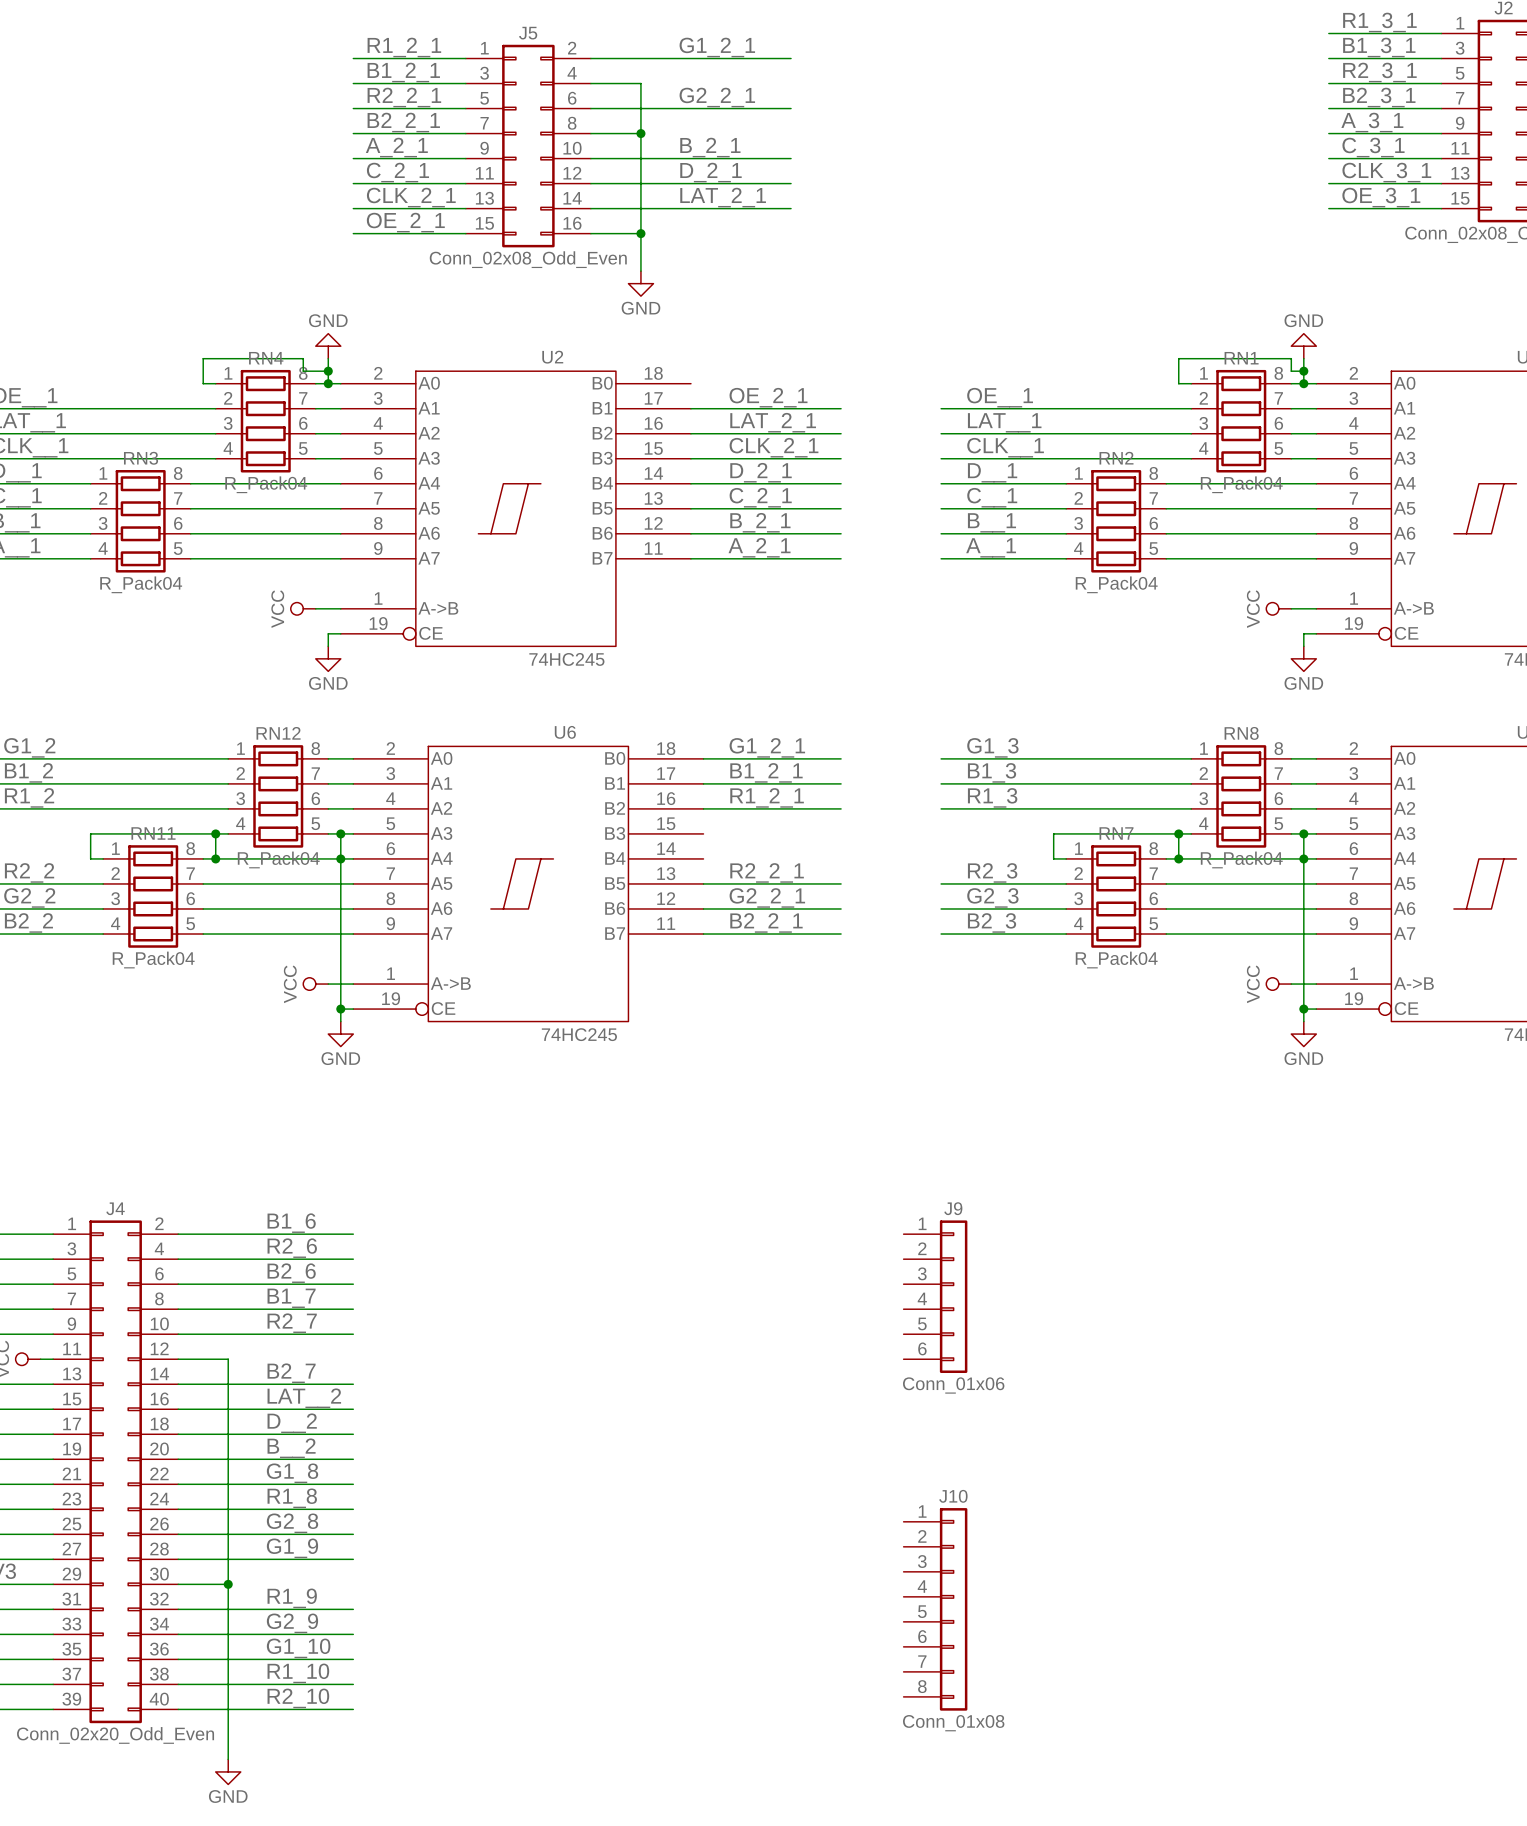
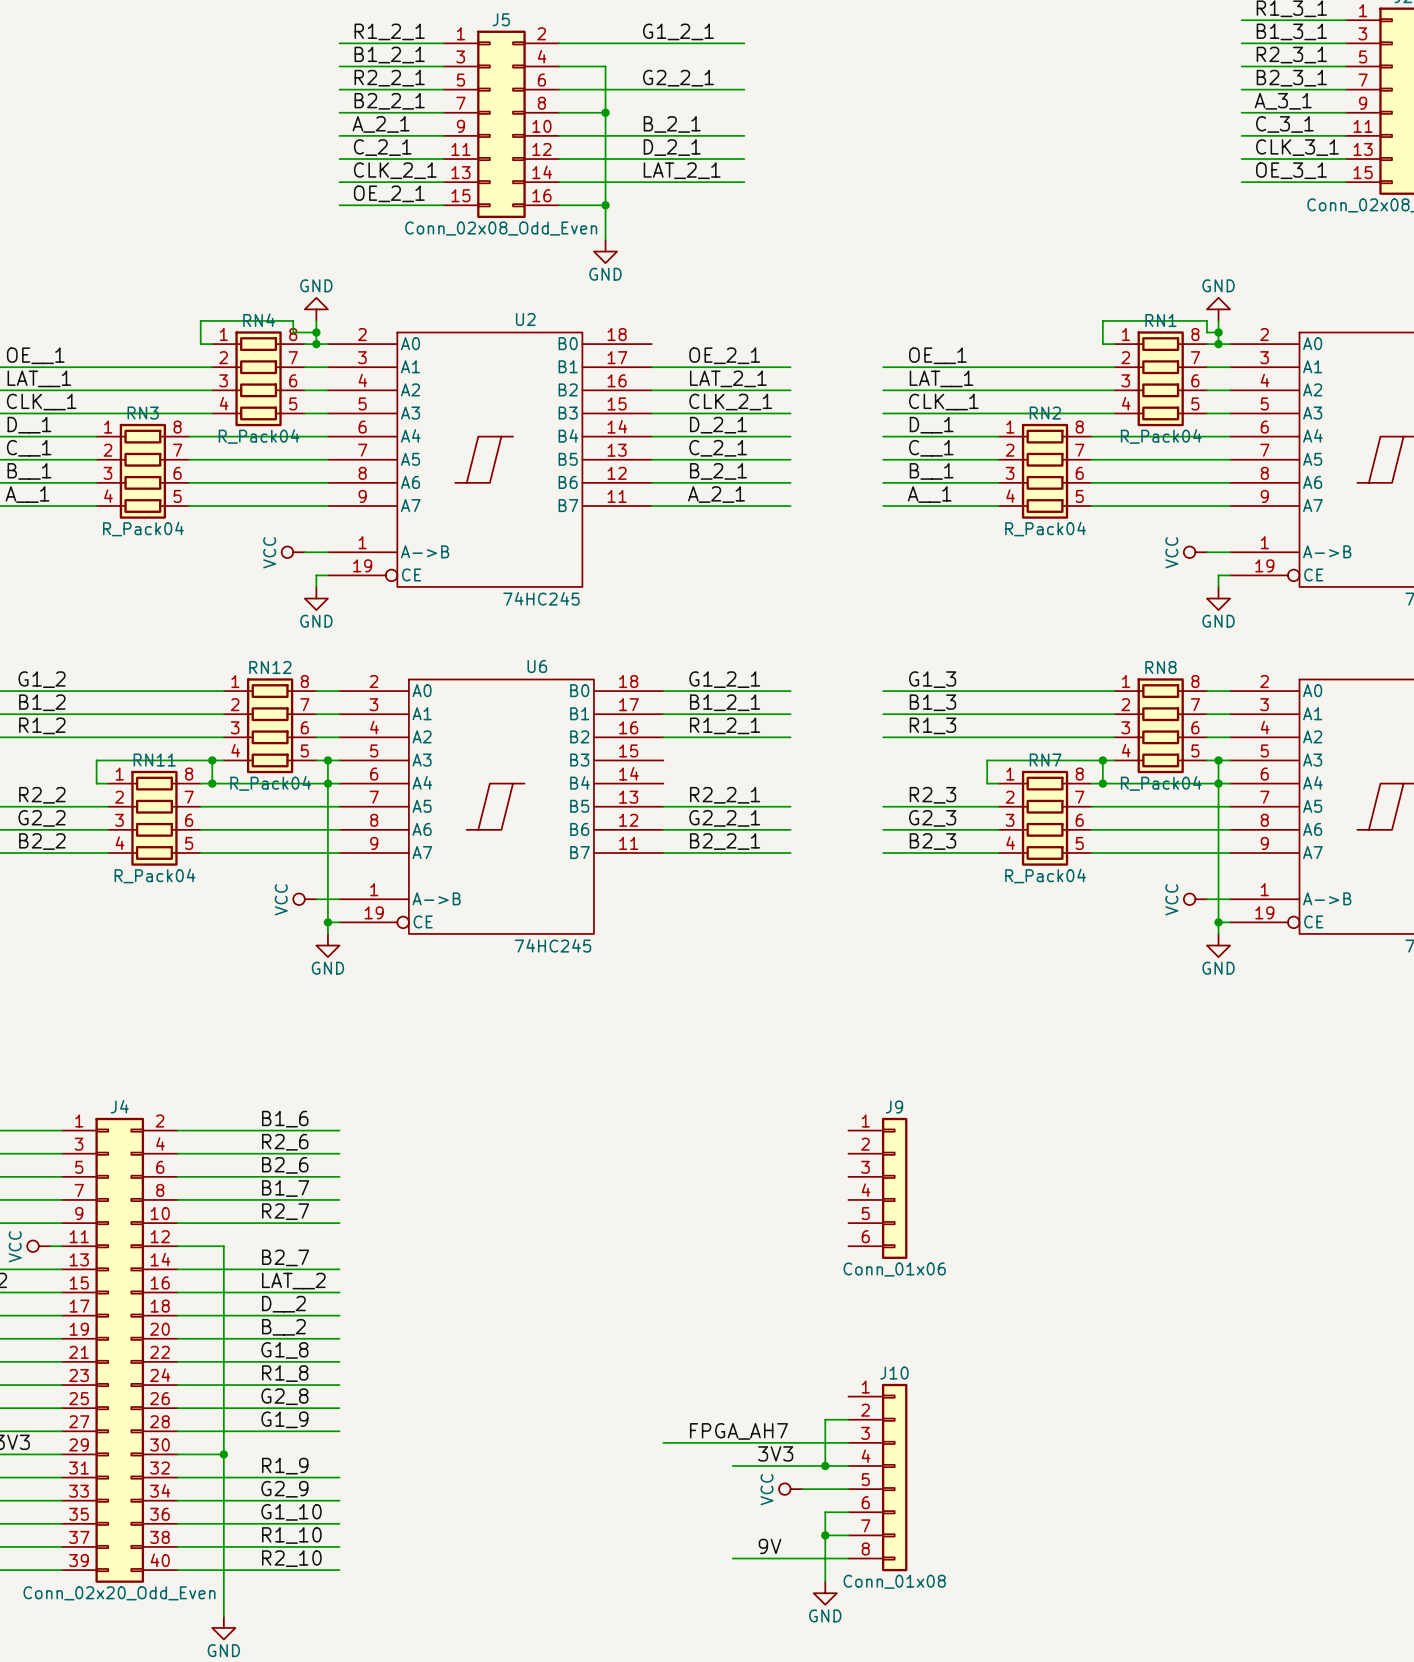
wire: none -> (848, 1419) (825, 1419) (825, 1465)
label: none -> FPGA_AH7 (738, 1431)
wire: none -> (663, 1442) (848, 1442)
label: none -> 3V3 (775, 1453)
wire: none -> (732, 1465) (848, 1465)
junction: none -> (825, 1465)
power symbol: none -> VCC (790, 1489)
wire: none -> (802, 1489) (848, 1489)
wire: none -> (848, 1512) (825, 1512) (825, 1581)
wire: none -> (825, 1535) (848, 1535)
junction: none -> (825, 1535)
label: none -> 9V (770, 1546)
wire: none -> (732, 1558) (848, 1558)
power symbol: none -> GND (825, 1593)

